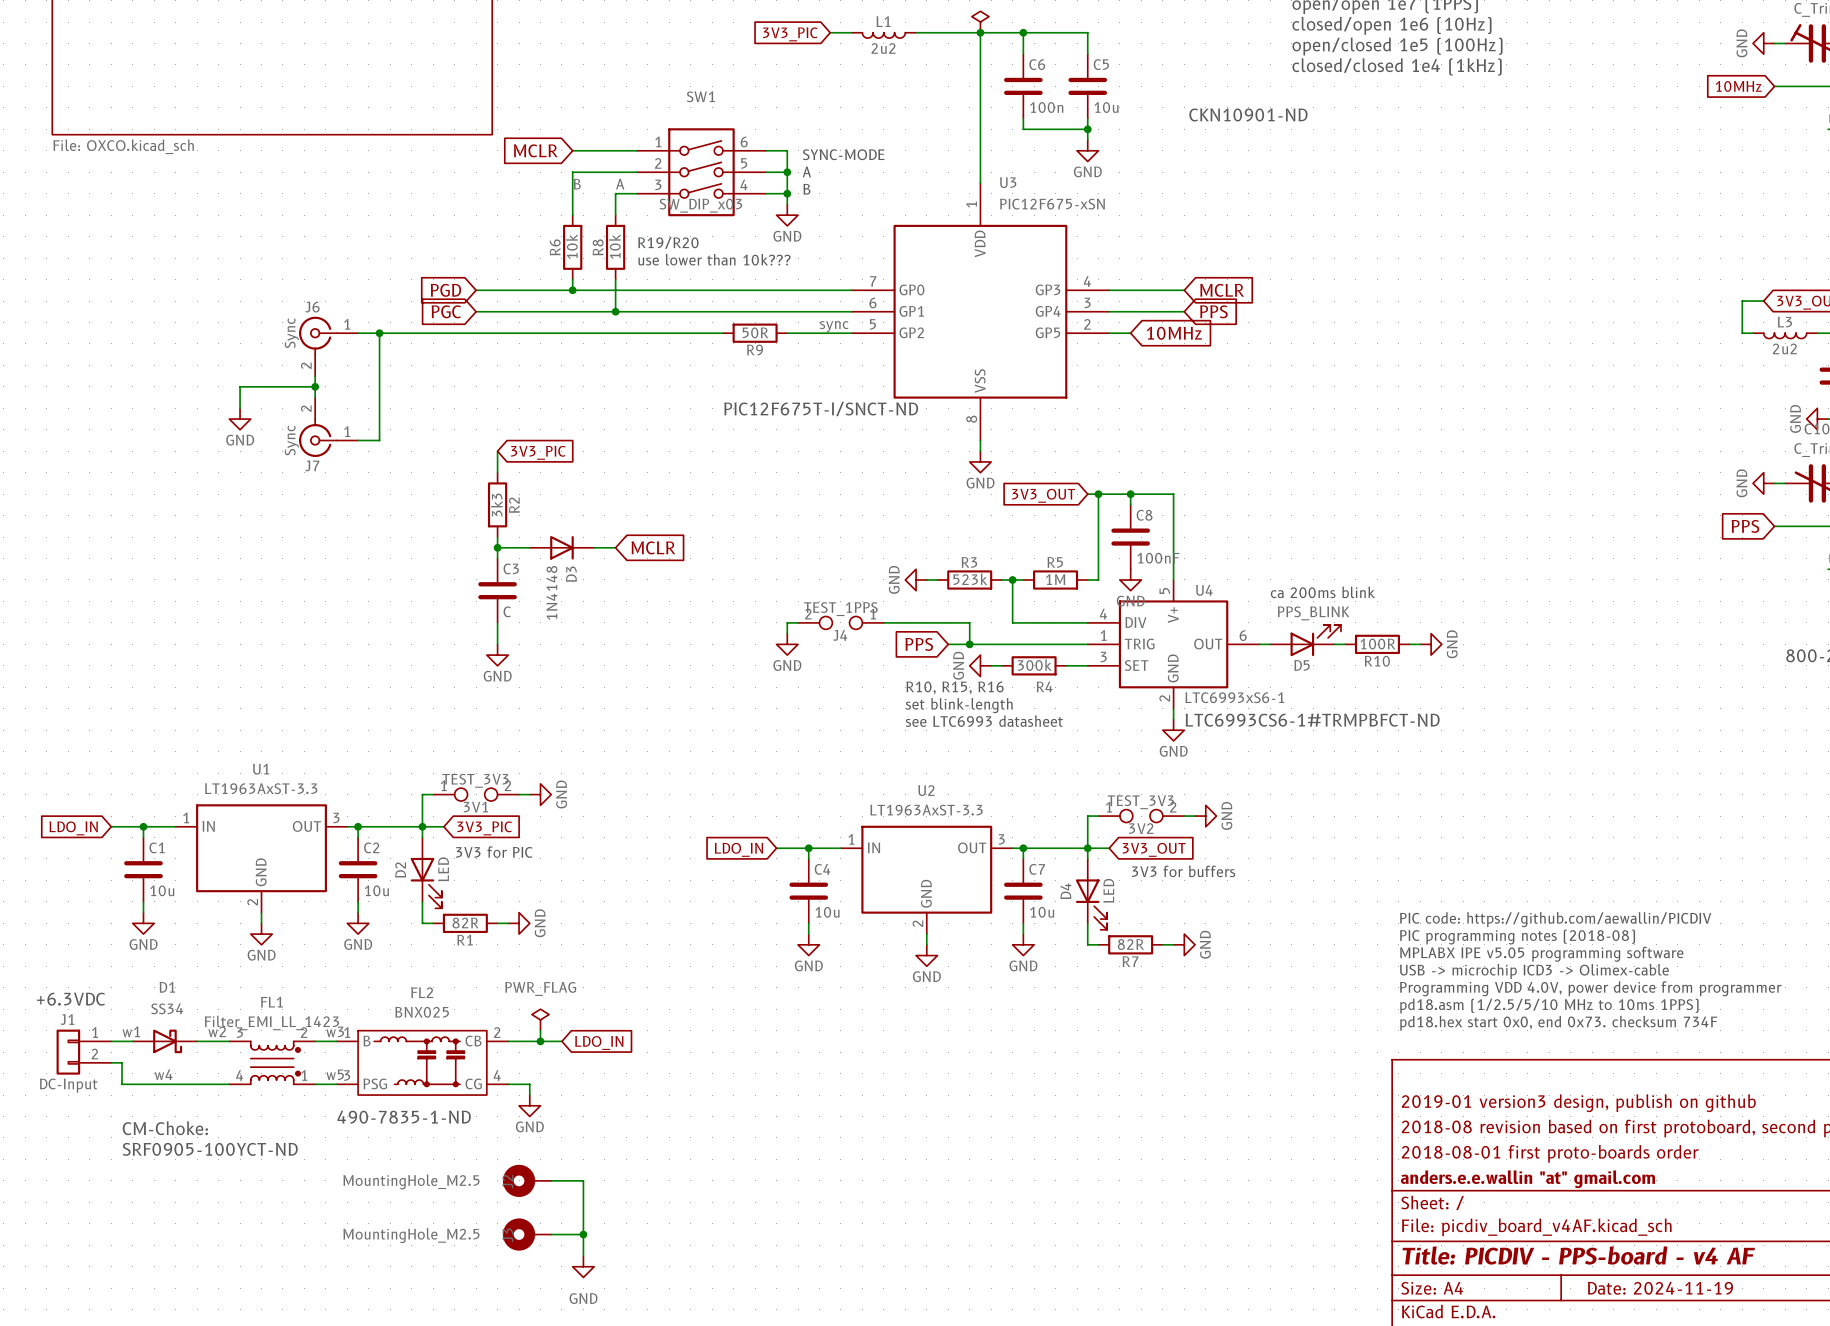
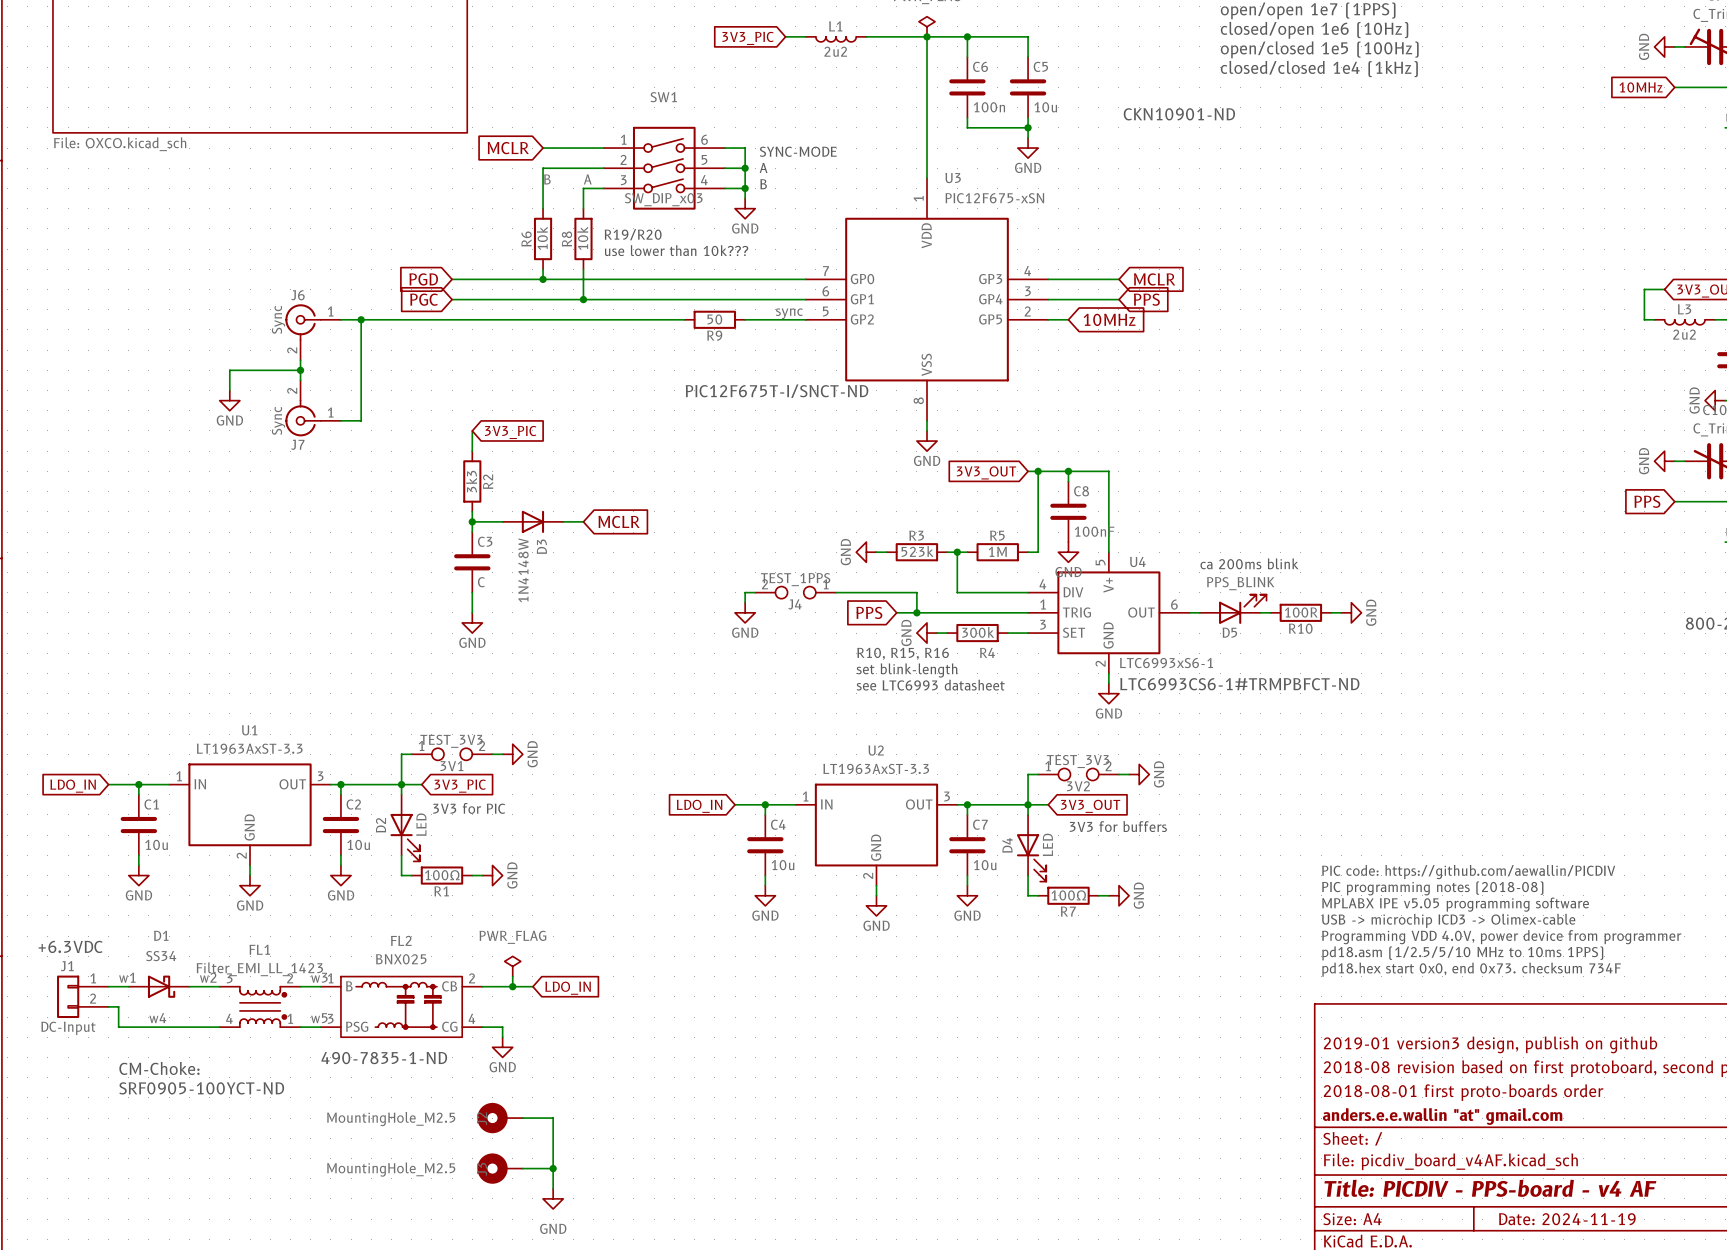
R9 value: 50R (755, 332) -> 50 (714, 319)
D3 value: 1N4148 (551, 592) -> 1N4148W (523, 570)
R1 value: 82R (465, 923) -> 100Ω (442, 875)
R7 value: 82R (1130, 944) -> 100Ω (1068, 895)

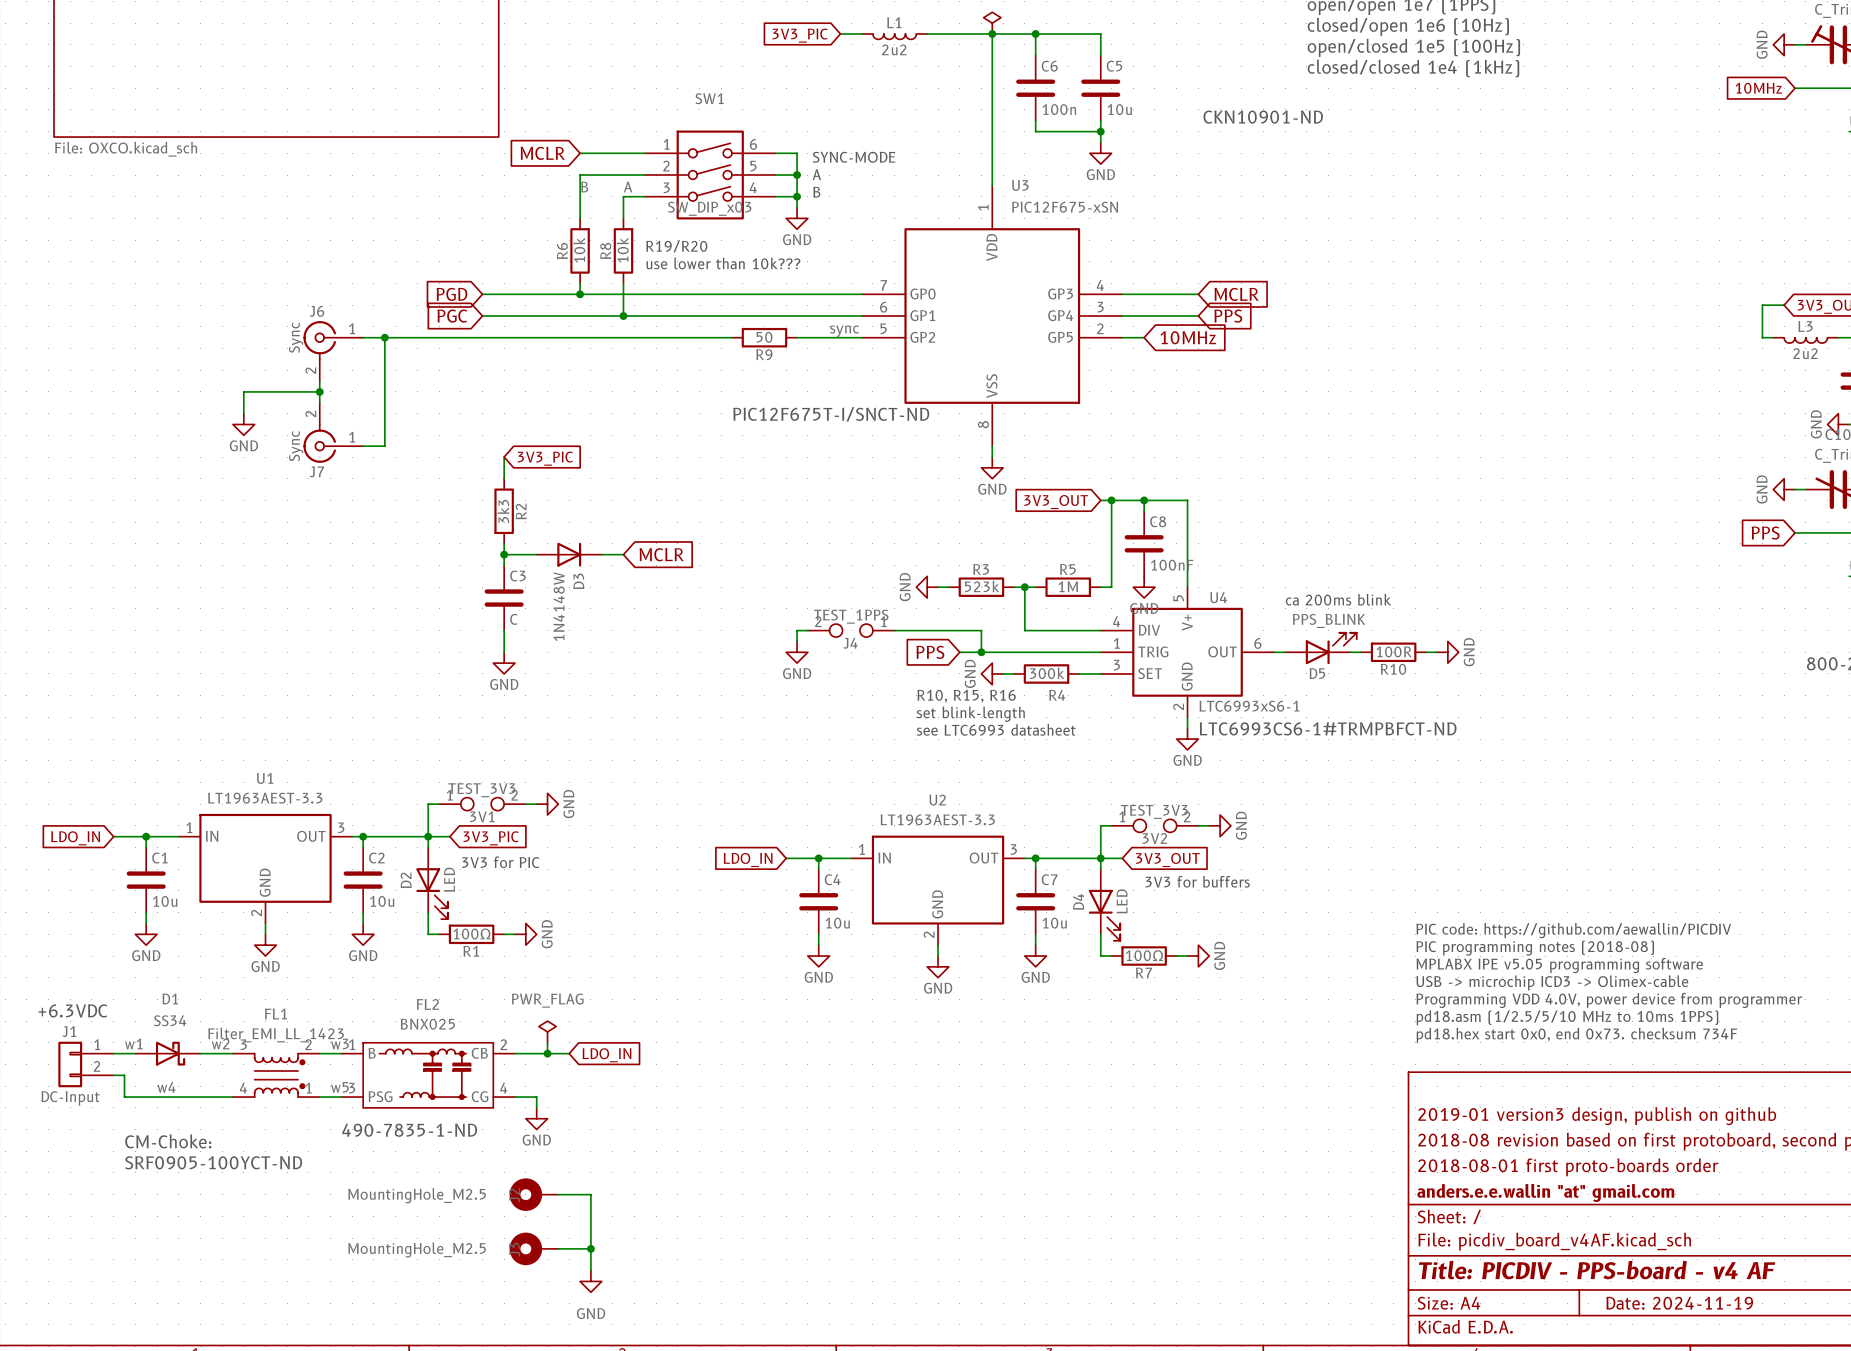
U1 value: LT1963AxST-3.3 (249, 748) -> LT1963AEST-3.3 (265, 798)
U2 value: LT1963AxST-3.3 (876, 768) -> LT1963AEST-3.3 (937, 819)

